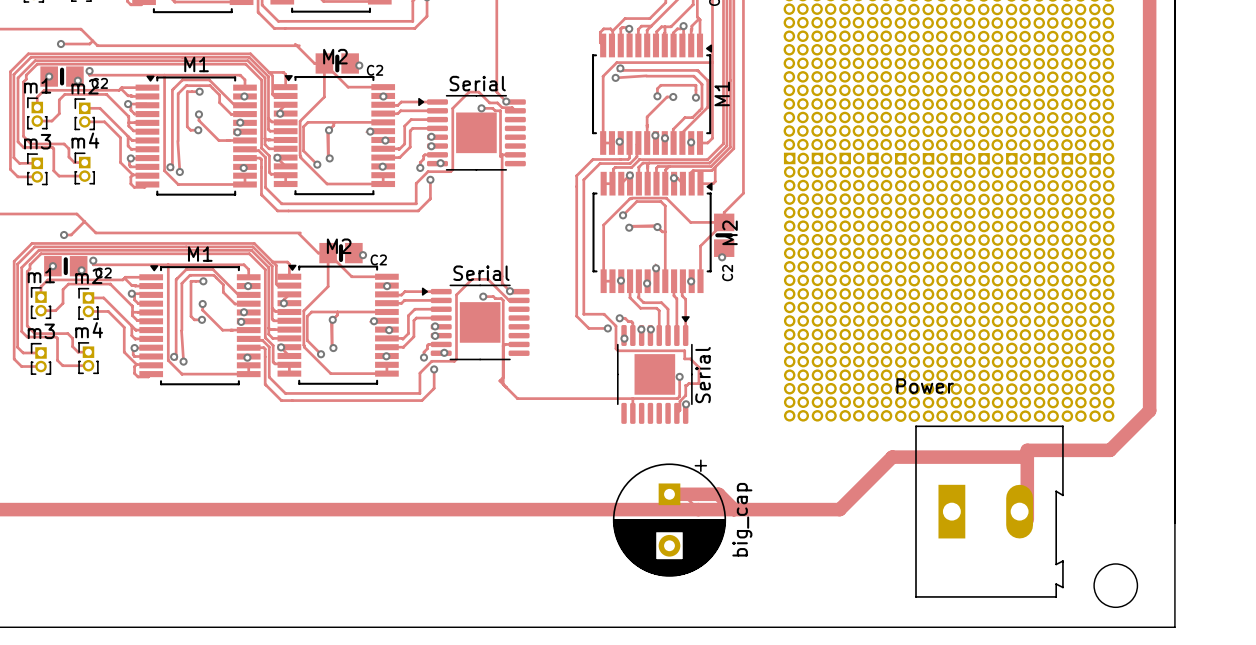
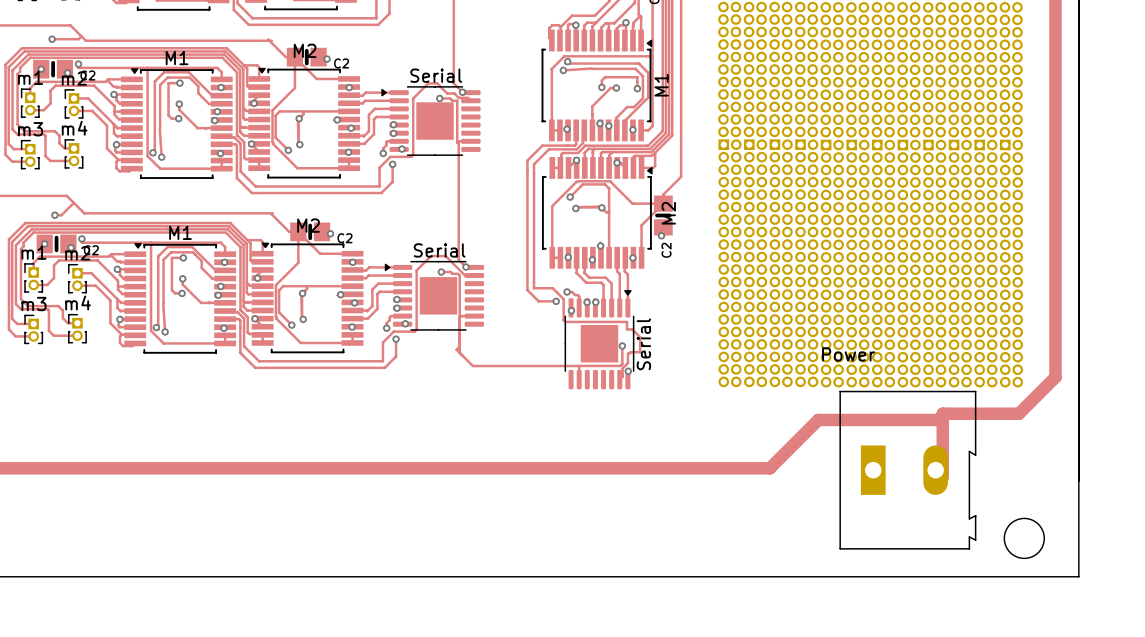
track: (698, 509) (683, 494) (669, 494) (718, 494) (733, 509) -> none
big_cap: (669, 518) -> none

